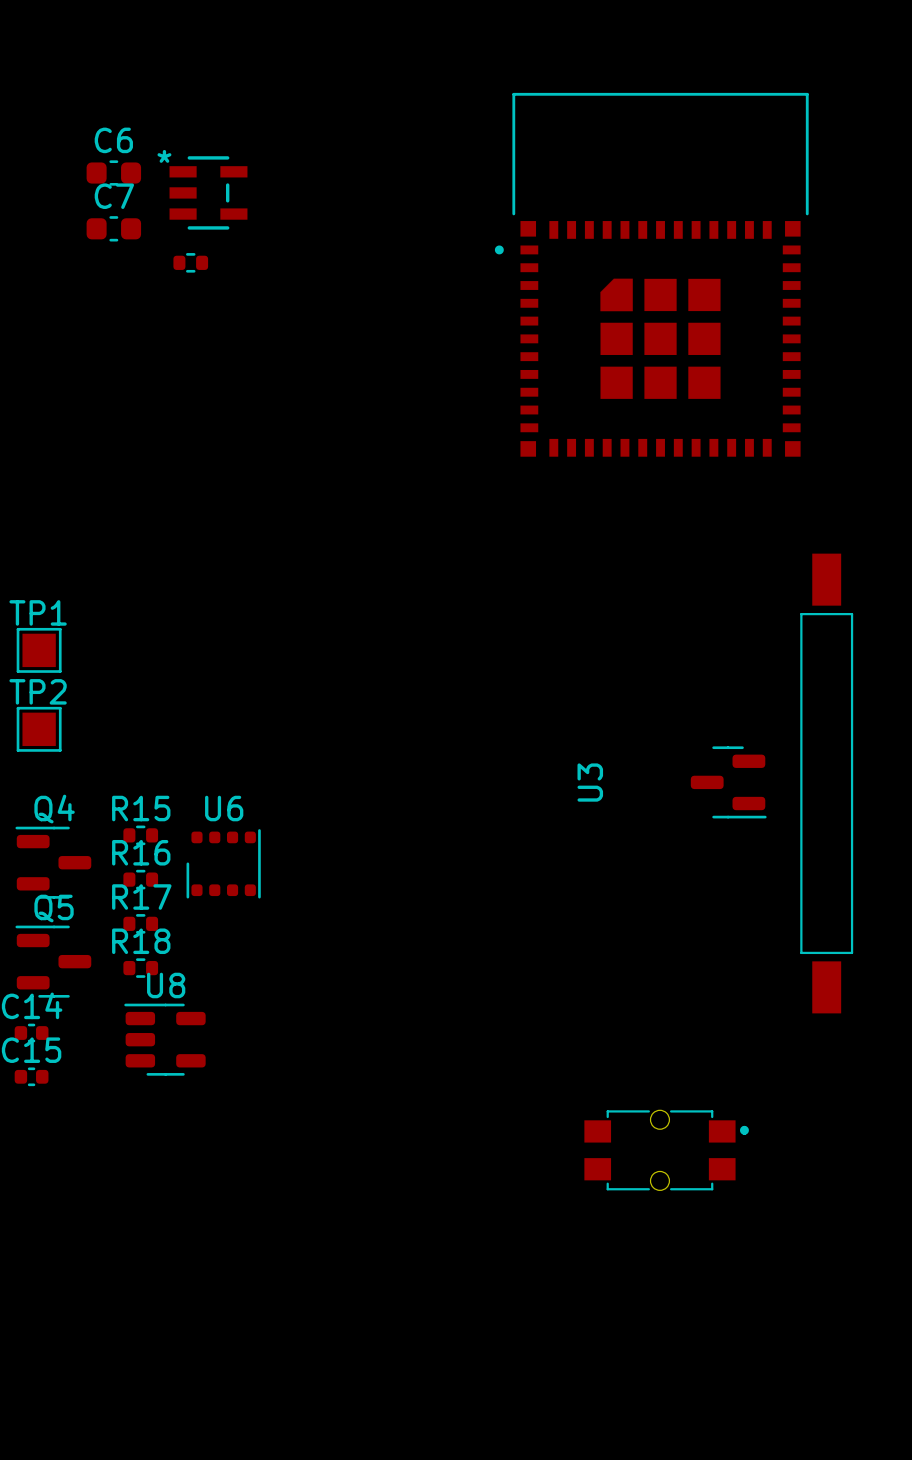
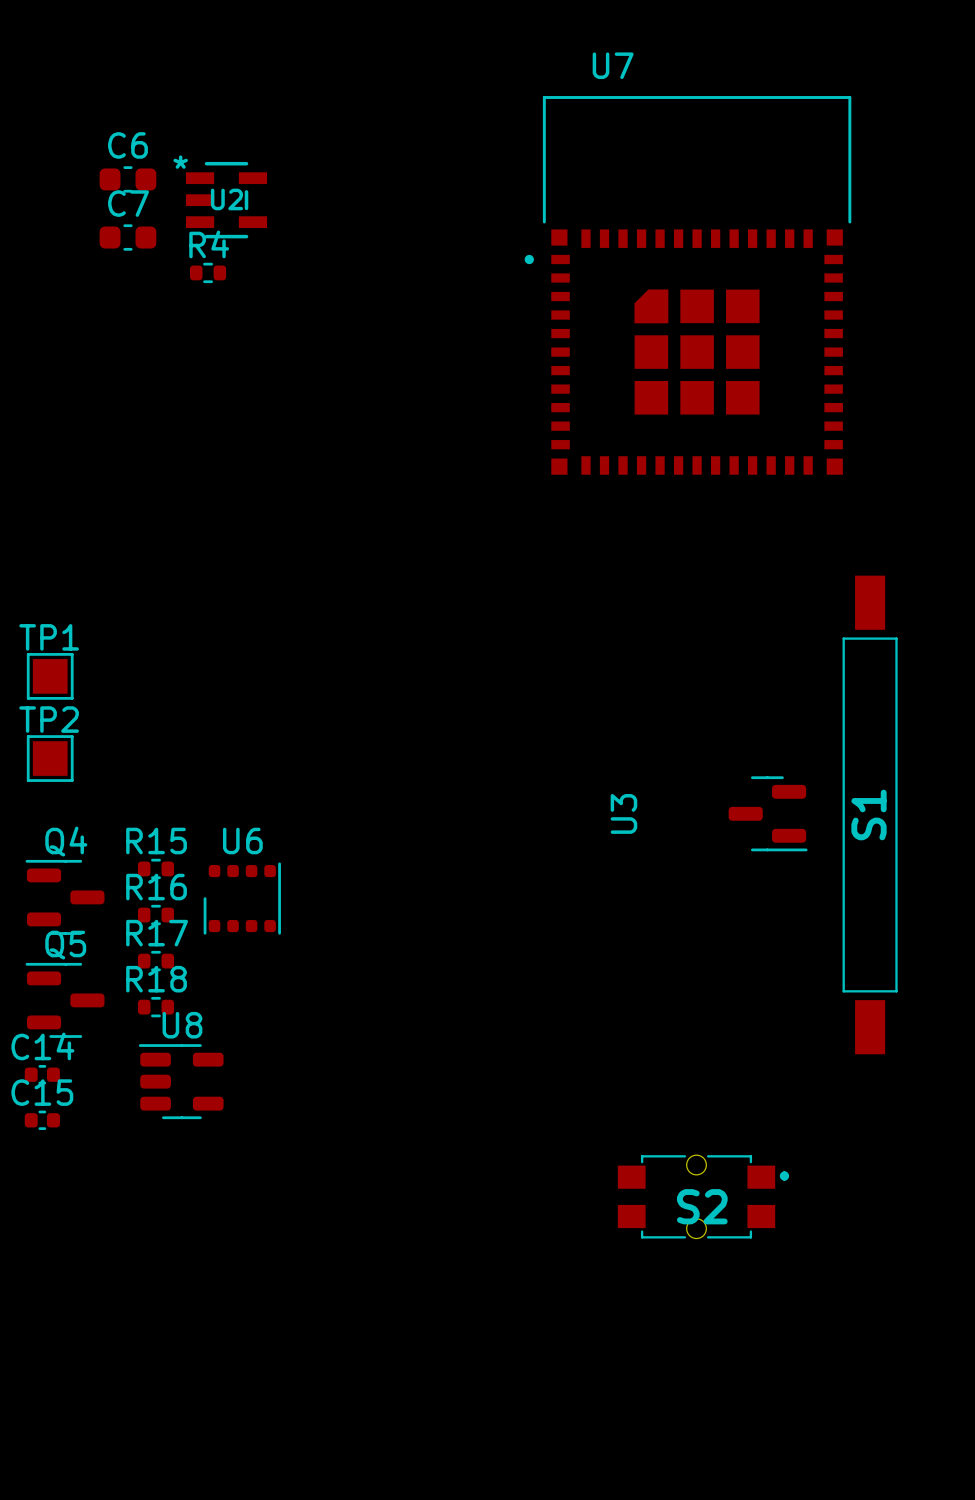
U7 name: none -> U7 (613, 65)
U2 name: none -> U2 (226, 199)
R4 name: none -> R4 (209, 244)
S1 name: none -> S1 (869, 814)
S2 name: none -> S2 (702, 1206)

